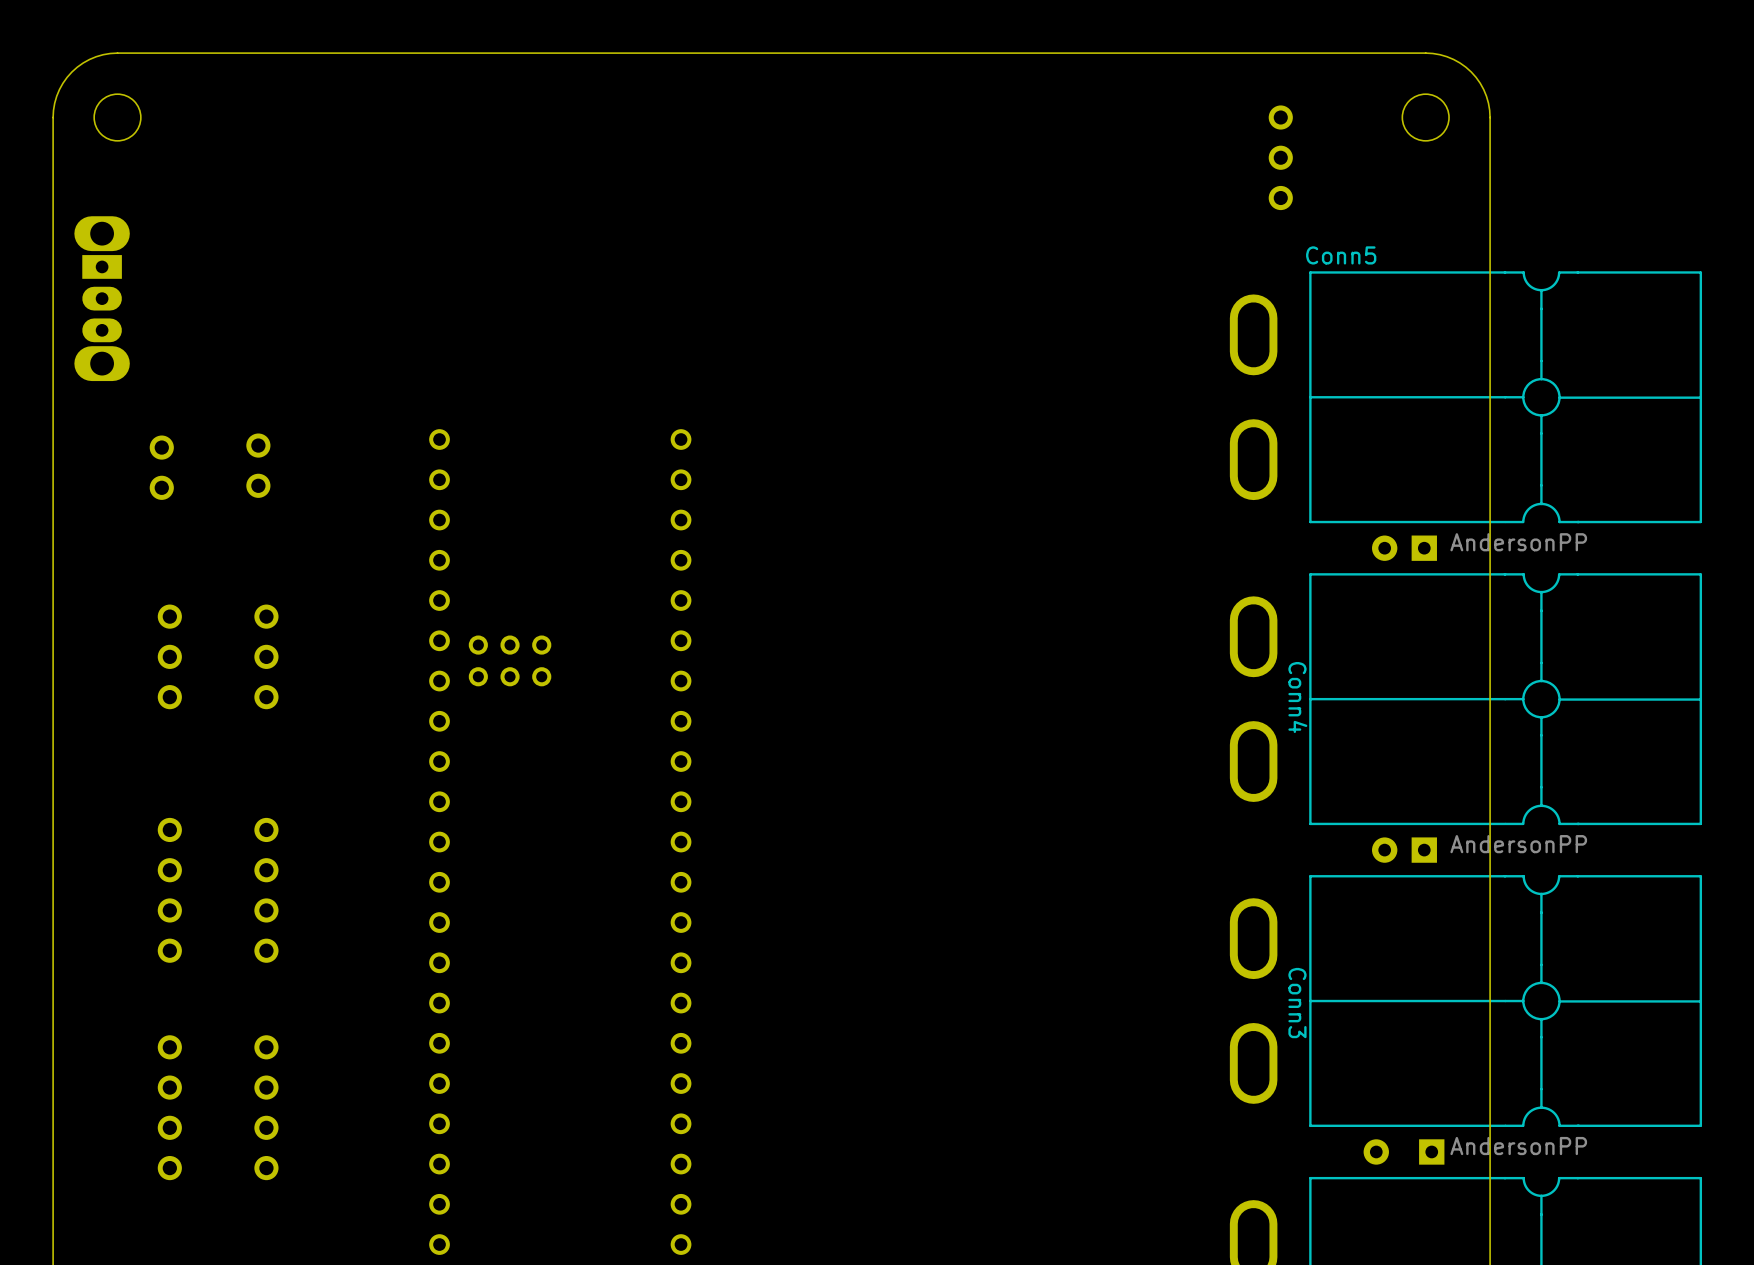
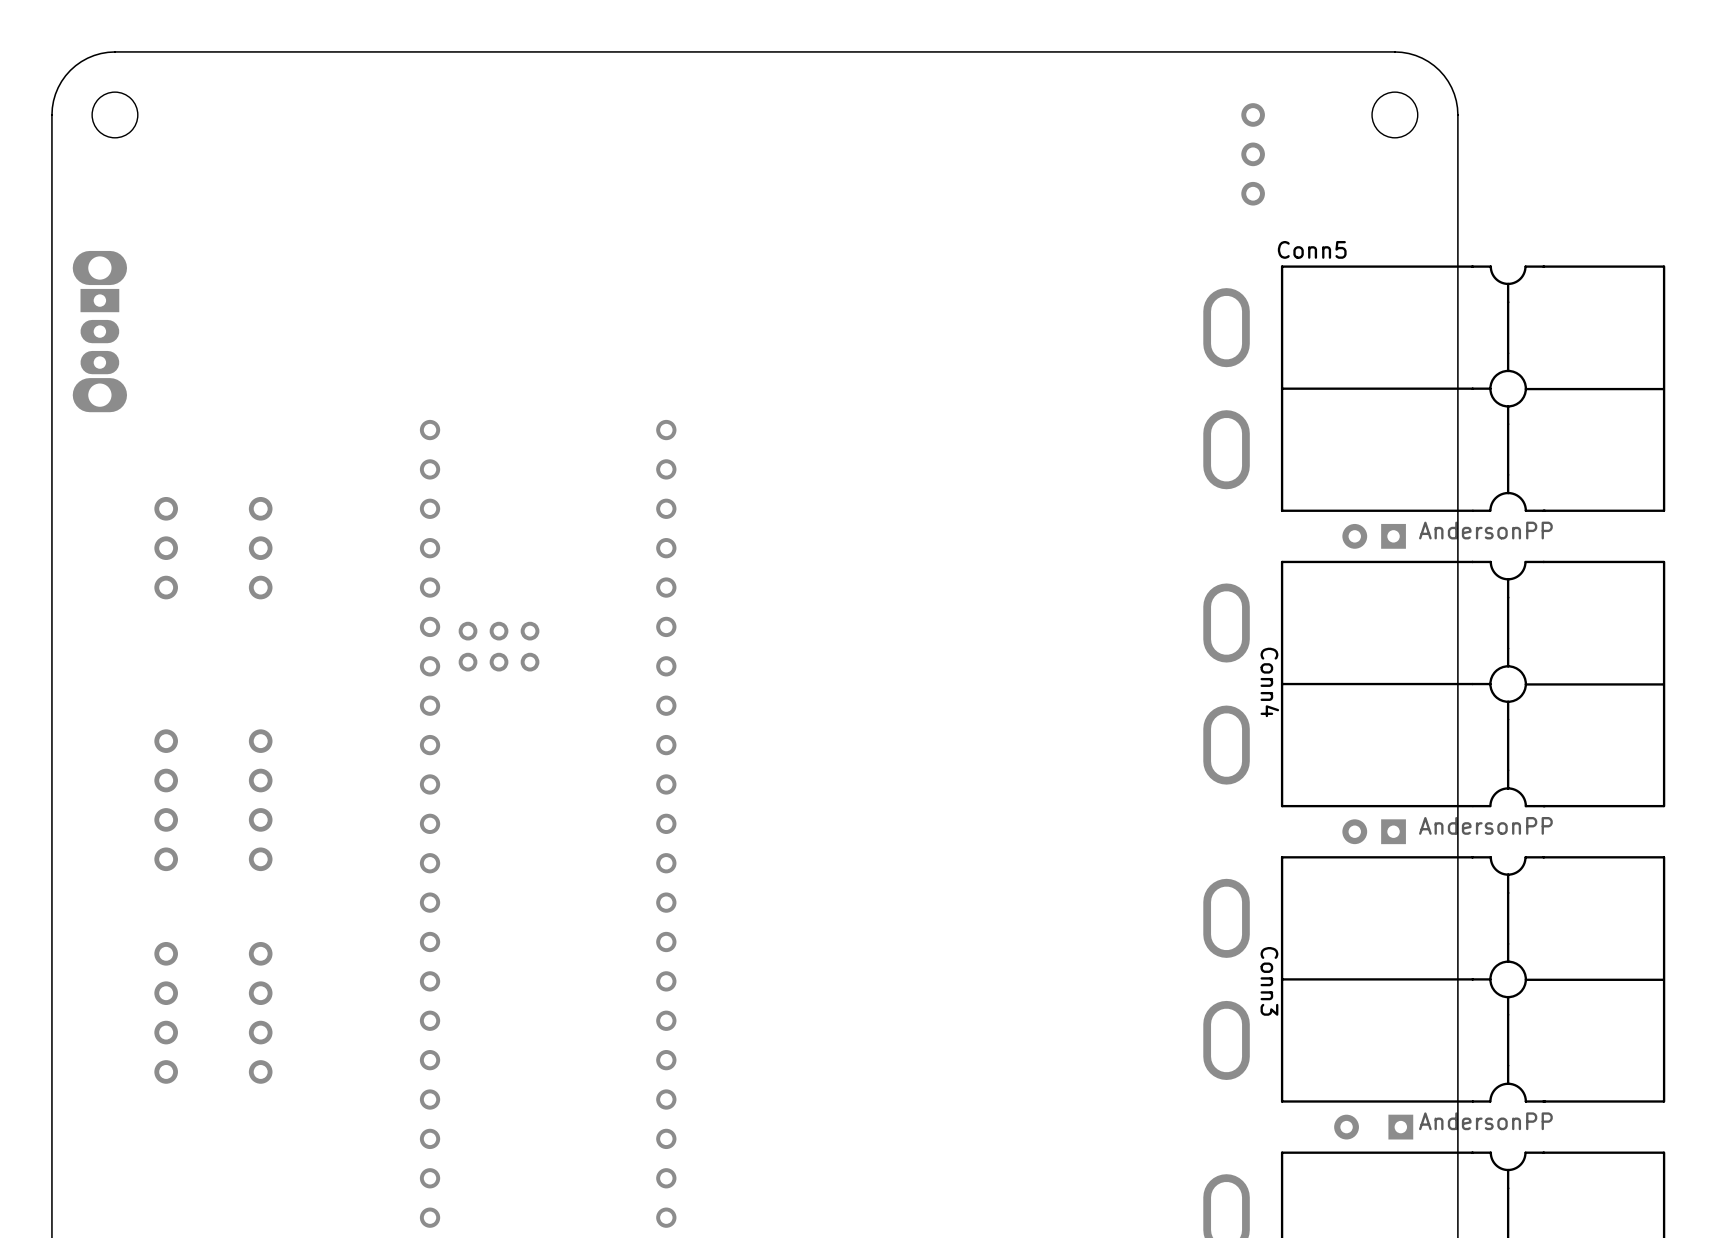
part position: (102, 298) -> (99, 331)
part: (258, 465) -> none
part: (161, 467) -> none
part: none -> (166, 548)
part: none -> (260, 548)
part: (169, 656) -> none
part: (266, 656) -> none
part: none -> (166, 800)
part: none -> (260, 800)
part: (169, 890) -> none
part: (266, 890) -> none
part: none -> (166, 1012)
part: none -> (260, 1012)
part: (169, 1107) -> none
part: (266, 1107) -> none

